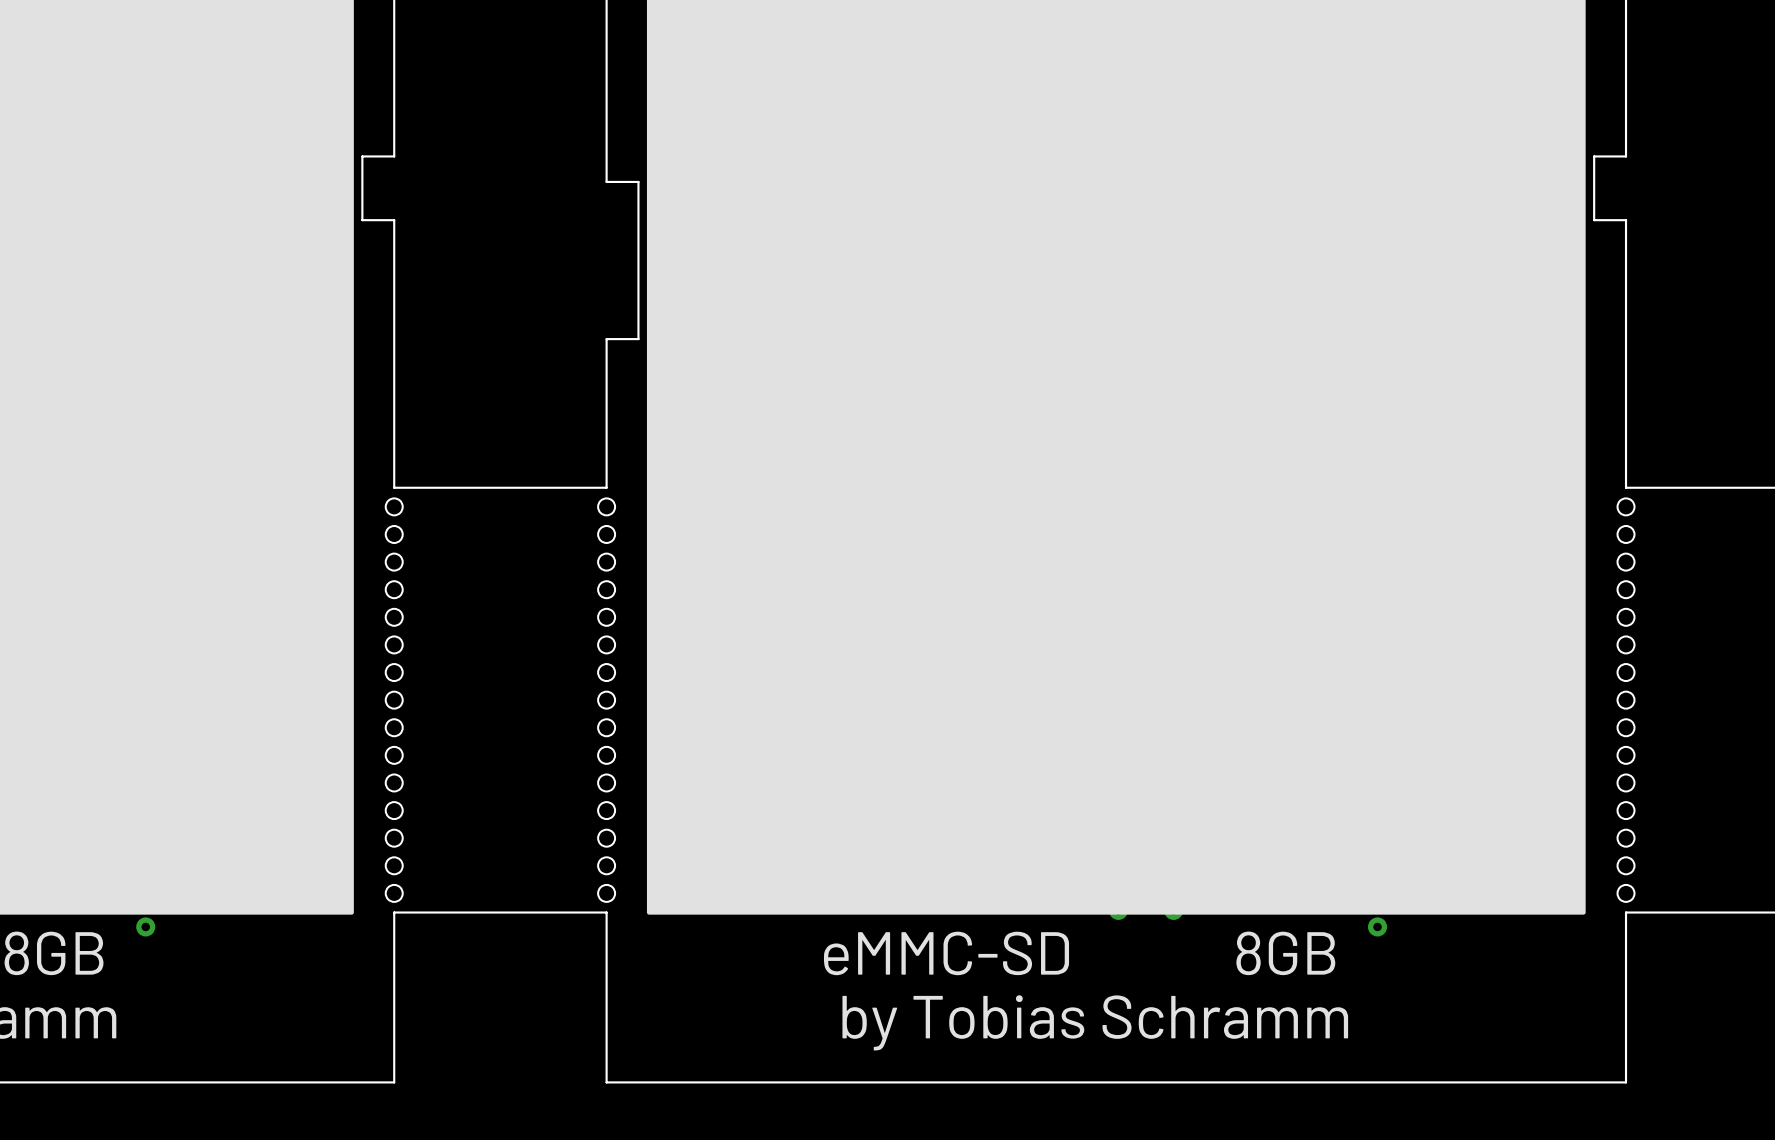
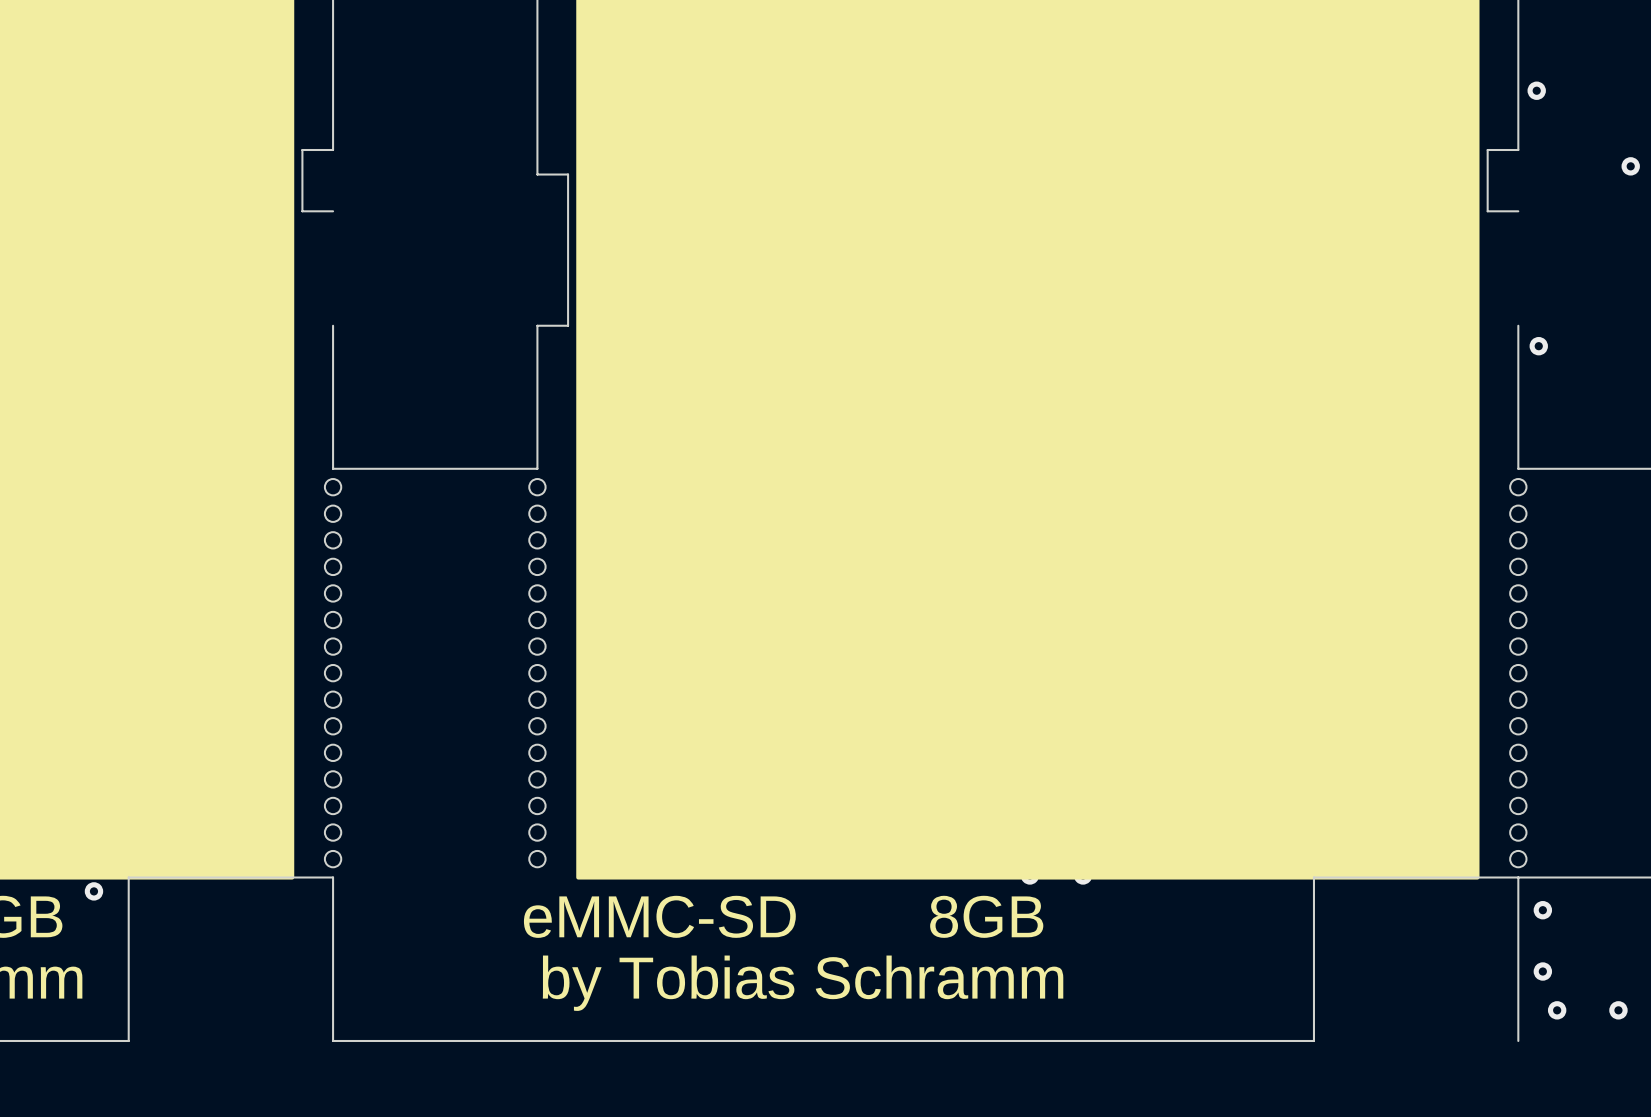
via: none -> (1536, 90)
via: none -> (1630, 166)
board edge: (394, 220) (394, 339) -> none
board edge: (1626, 220) (1626, 339) -> none
via: none -> (1538, 346)
board edge: (394, 912) (606, 912) (606, 1082) -> (333, 1040) (537, 1040)
via: (1377, 926) -> none
via: none -> (1542, 910)
text position: eMMC-SD (946, 953) -> eMMC-SD (659, 916)
text position: 8GB (1285, 953) -> 8GB (986, 916)
via: none -> (1542, 971)
text position: by Tobias Schramm (1095, 1022) -> by Tobias Schramm (803, 983)
via: none -> (1557, 1010)
via: none -> (1618, 1010)
board edge: (394, 1082) (181, 1082) -> (333, 877) (128, 877) (128, 1040)
board edge: (1626, 1082) (1413, 1082) -> (1518, 877) (1313, 877) (1313, 1040)

